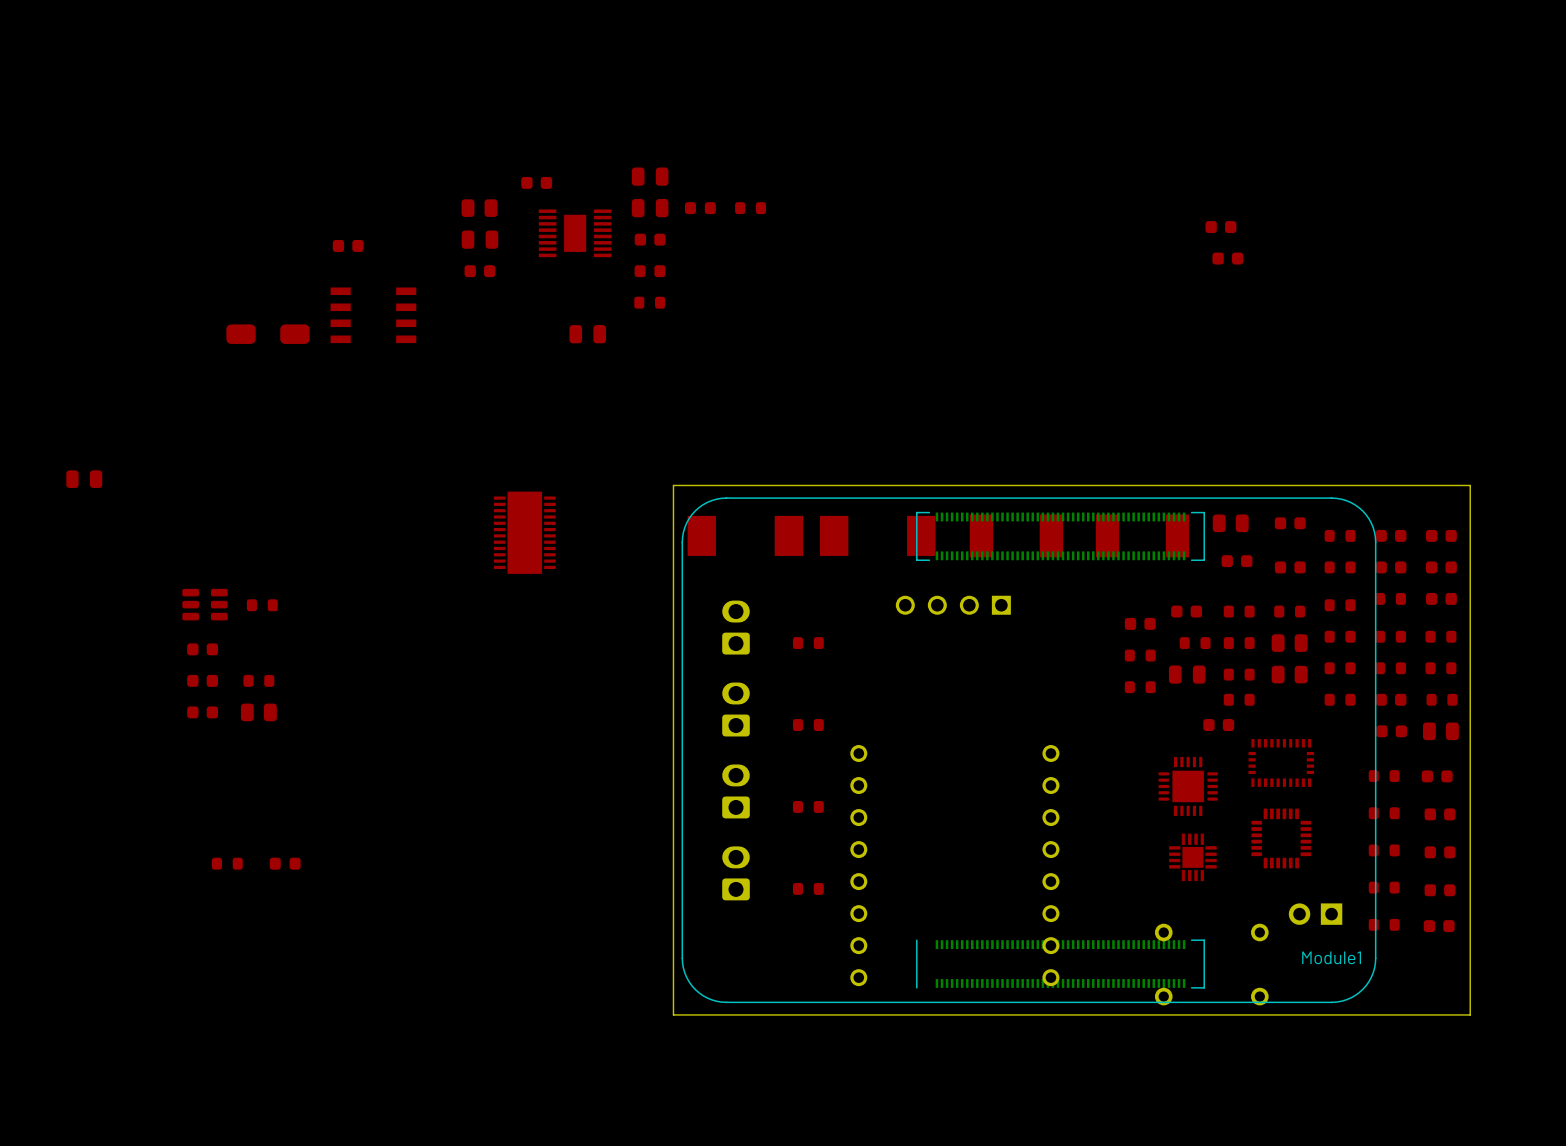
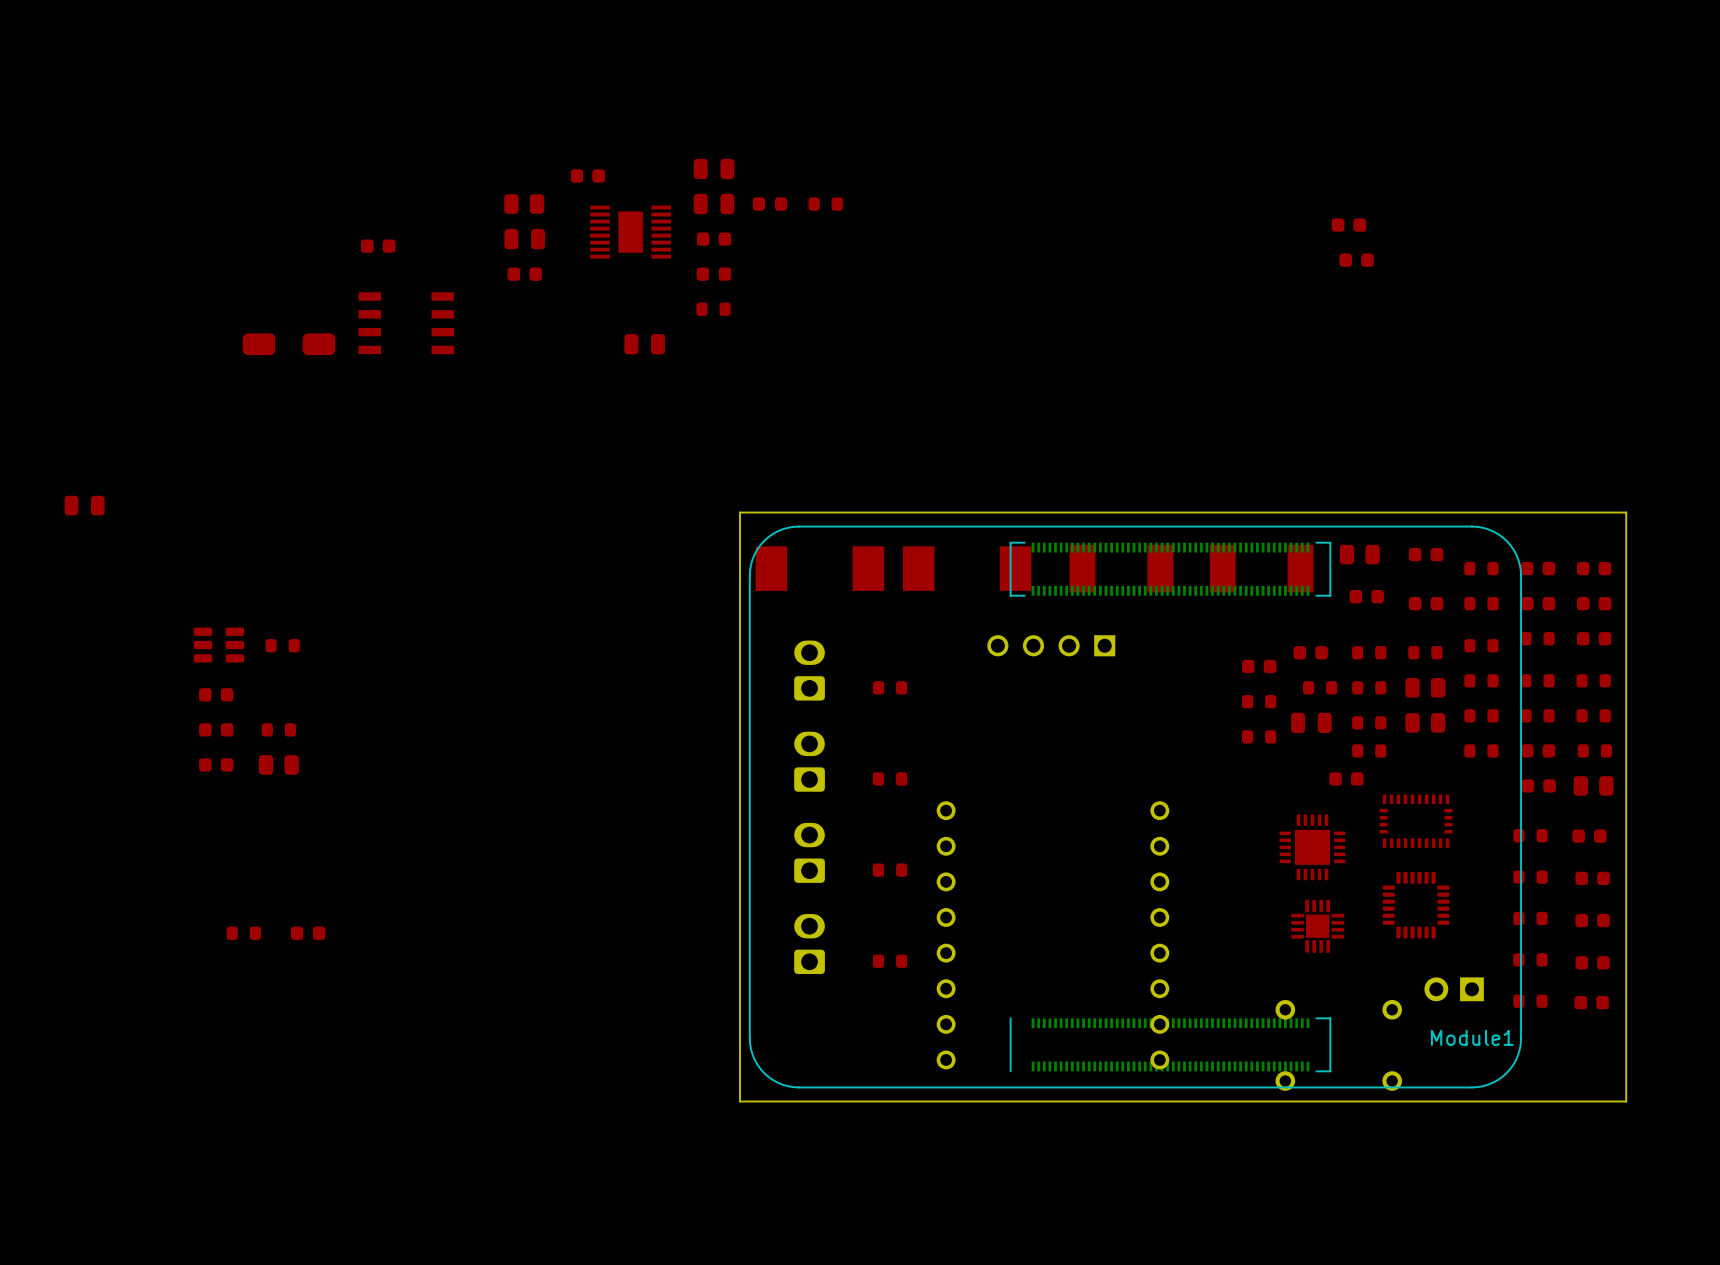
part: (524, 532) -> none

